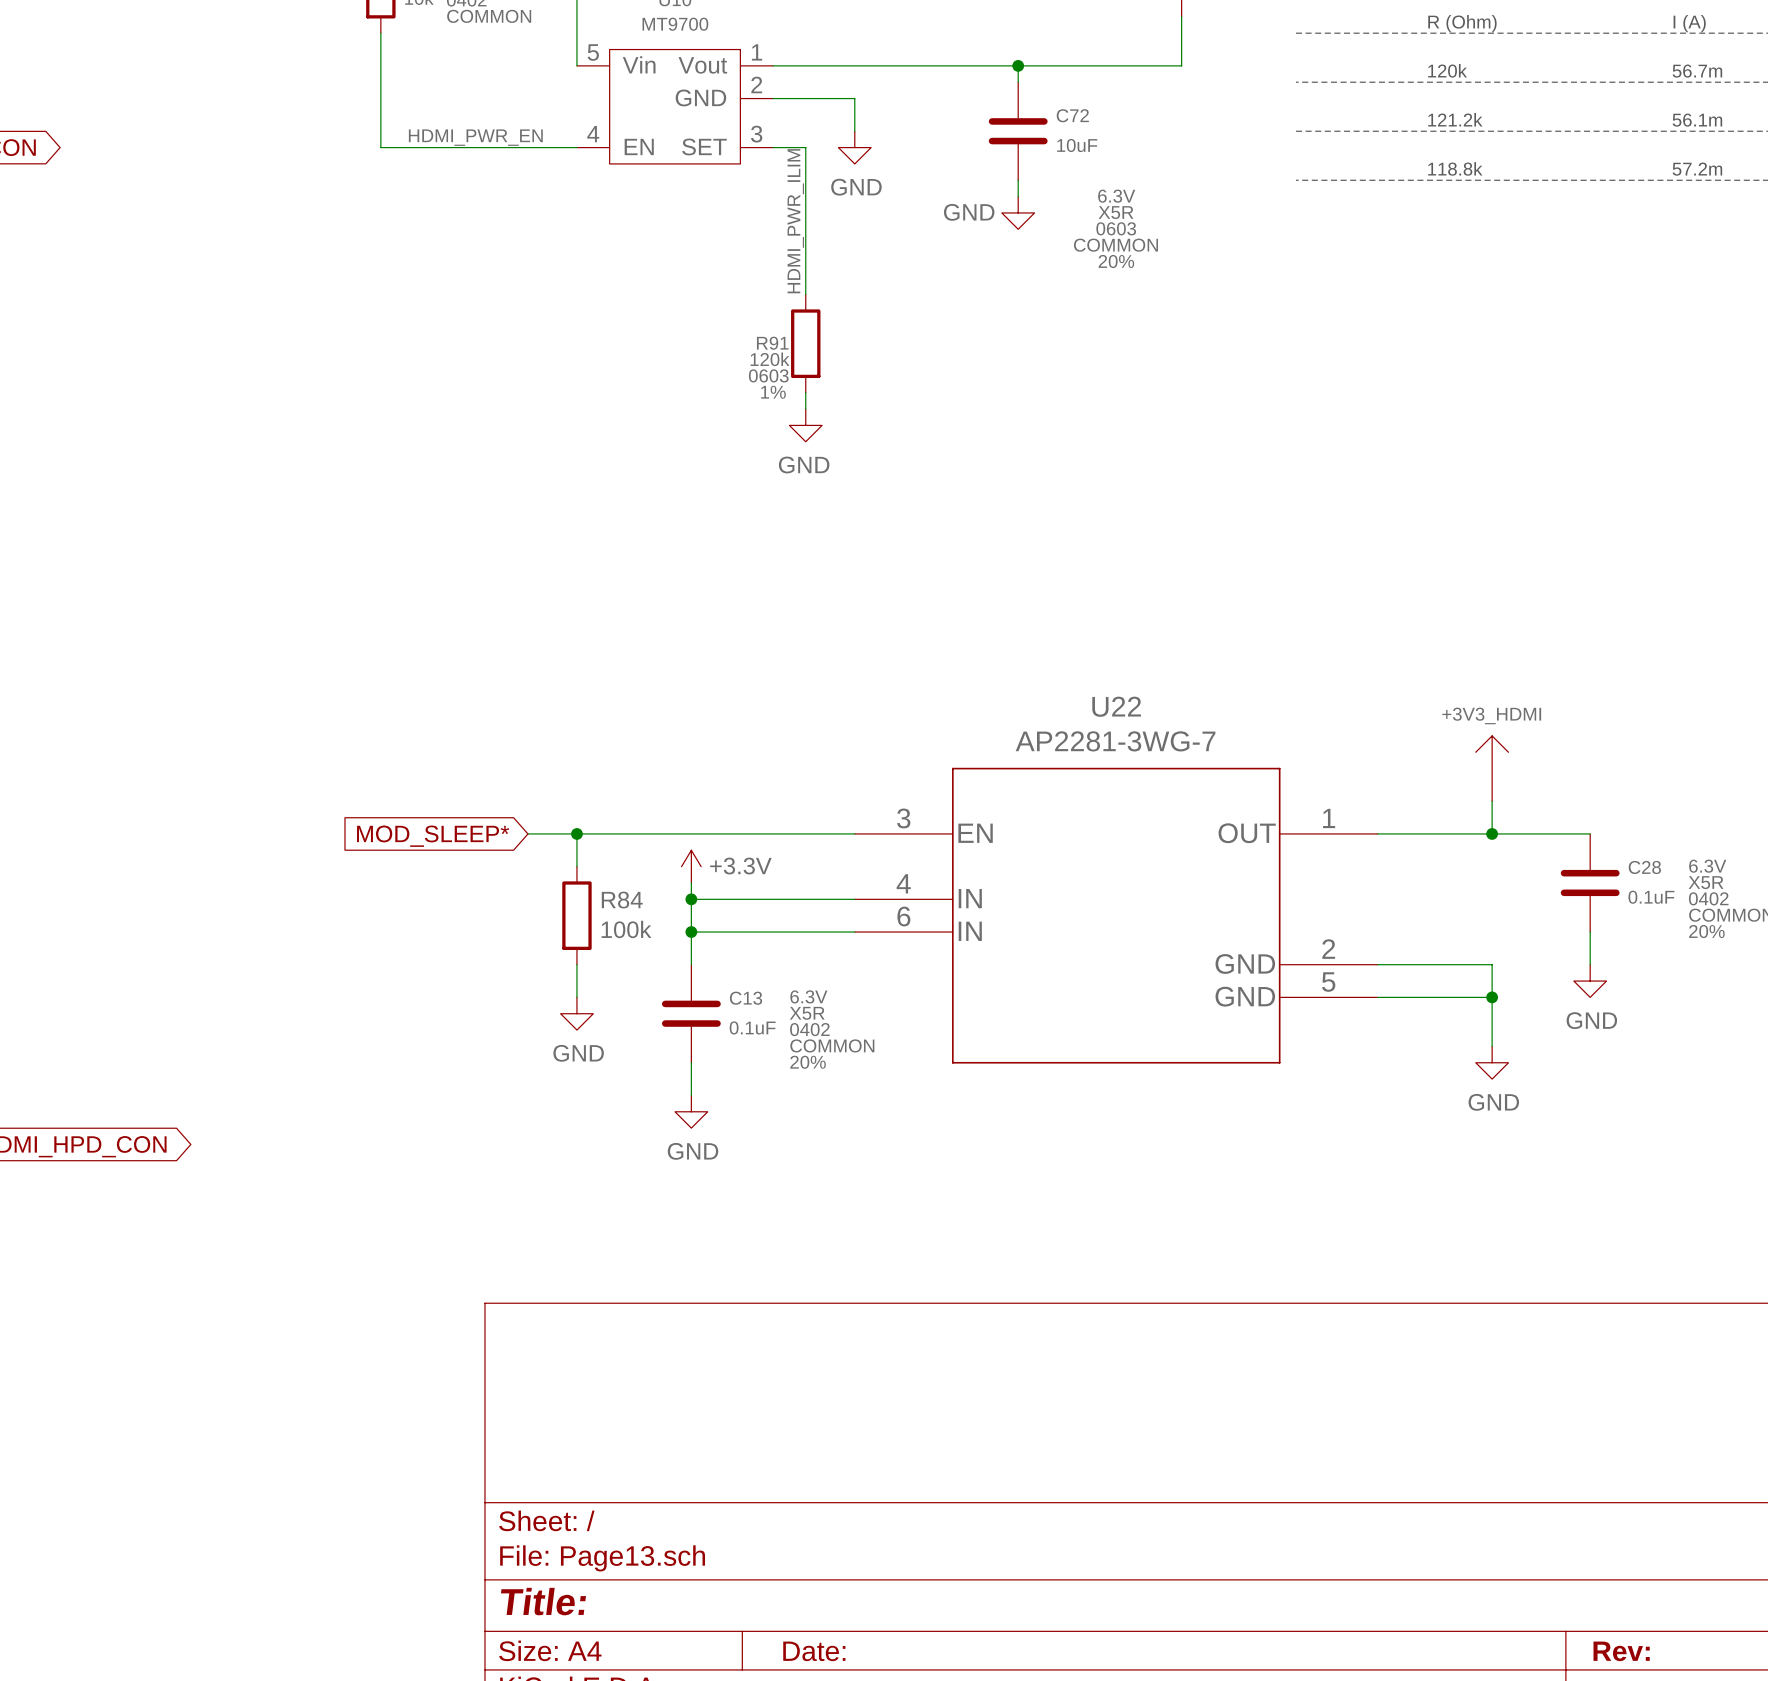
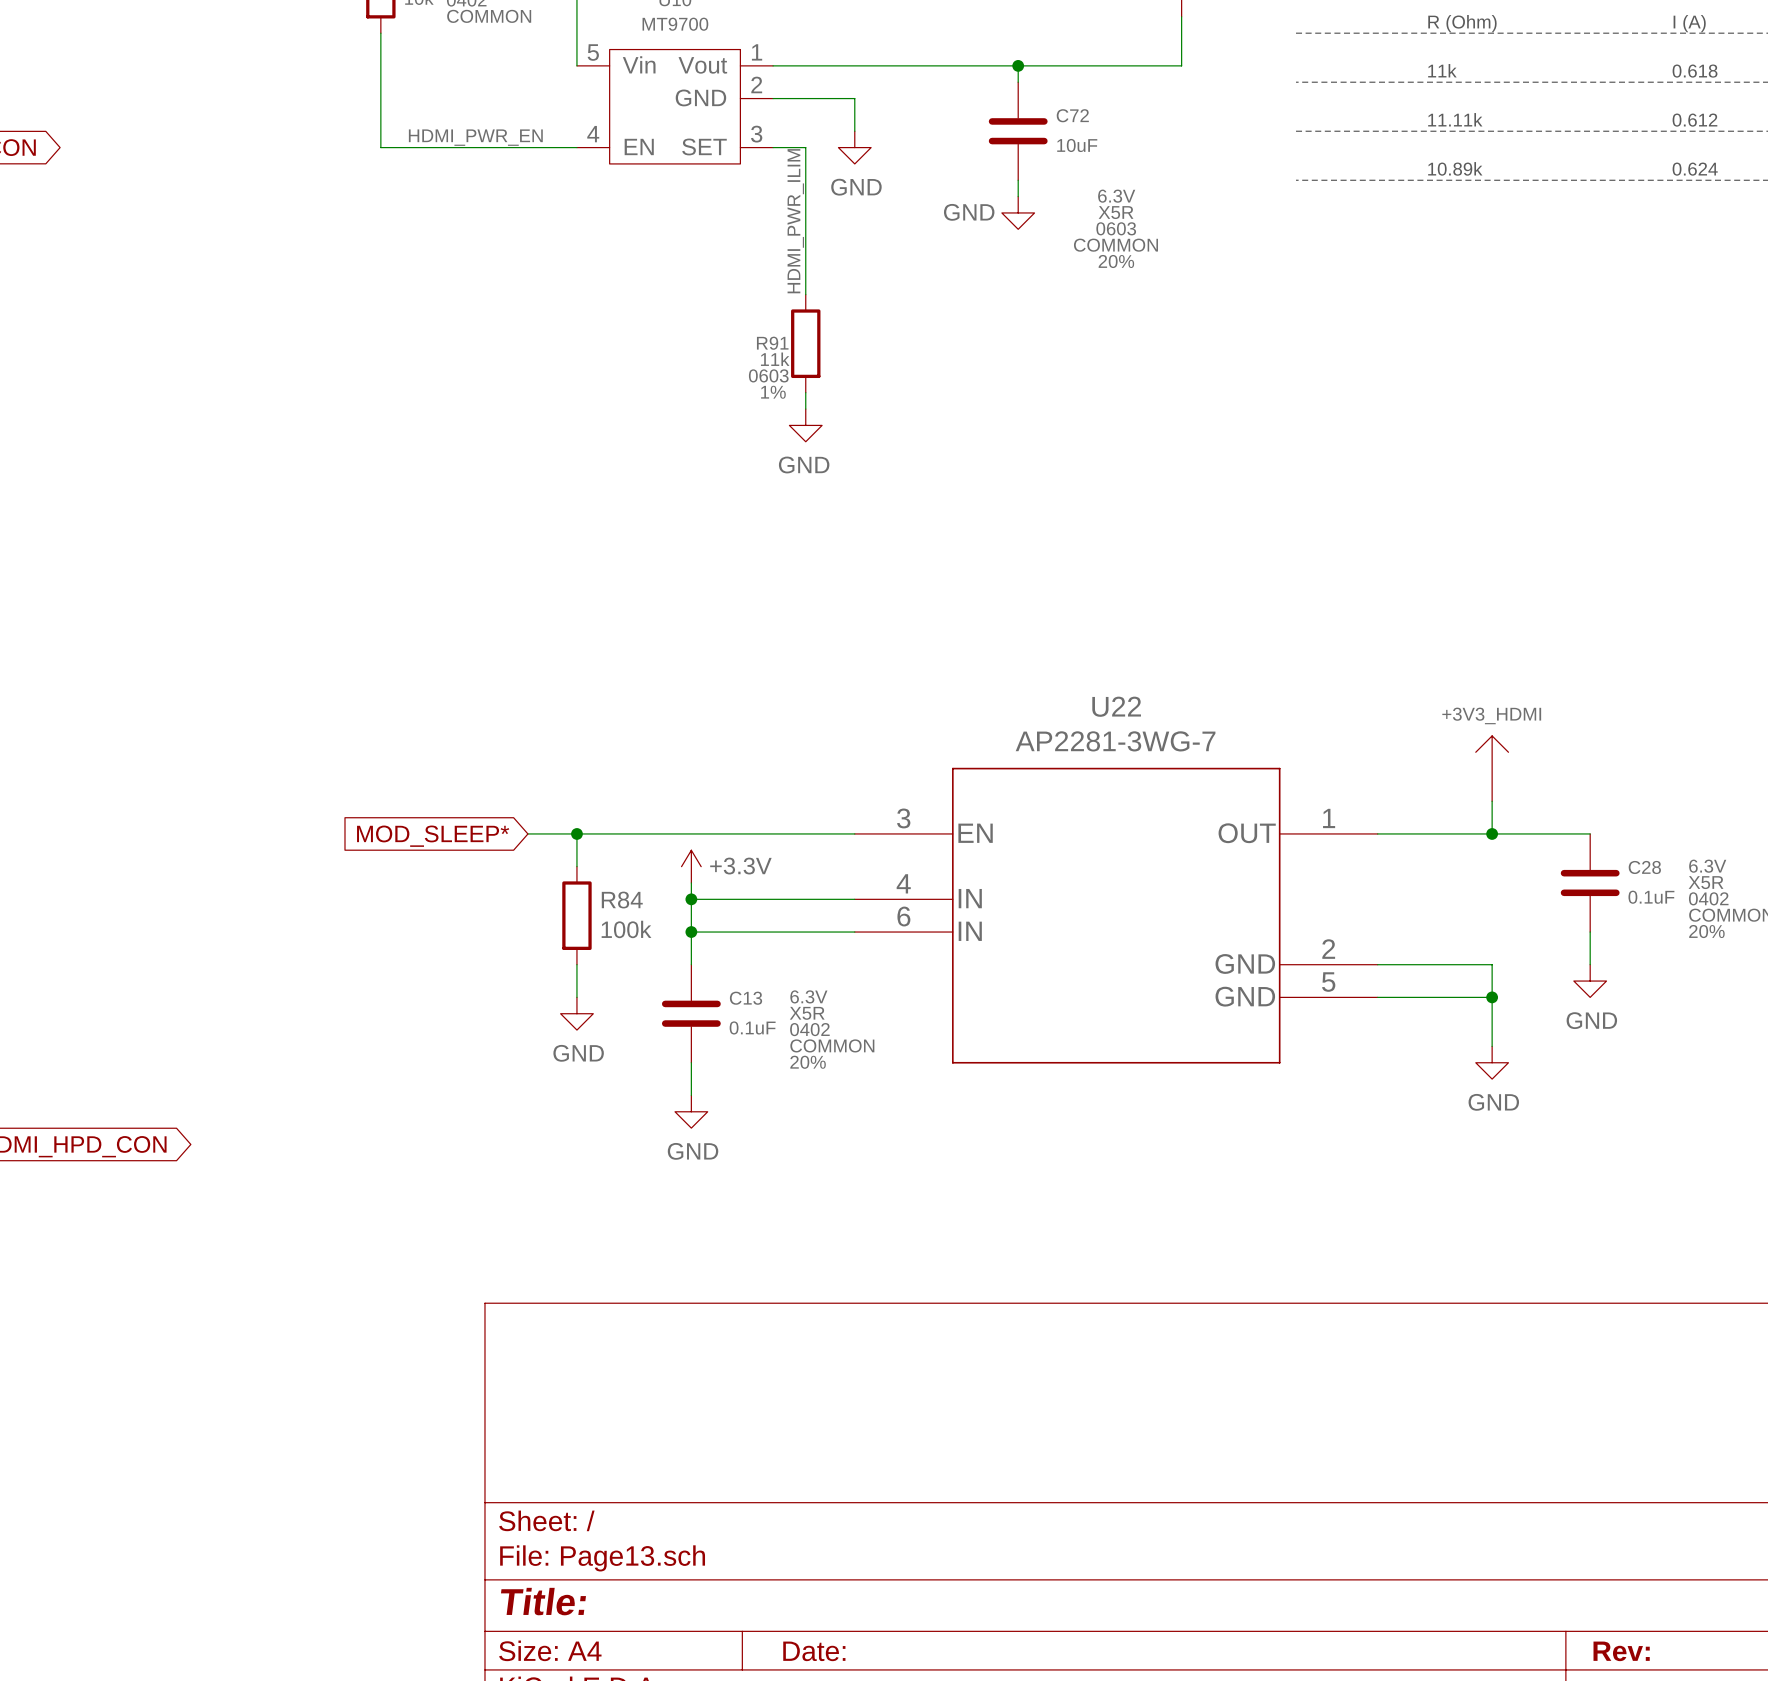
text: 120k (1447, 70) -> 11k (1442, 70)
text: 56.7m (1697, 71) -> 0.618 (1695, 71)
text: 121.2k (1455, 119) -> 11.11k (1455, 119)
text: 56.1m (1697, 120) -> 0.612 (1694, 120)
text: 118.8k (1455, 168) -> 10.89k (1455, 168)
text: 57.2m (1697, 169) -> 0.624 (1695, 169)
R91 value: 120k (770, 359) -> 11k (775, 359)

